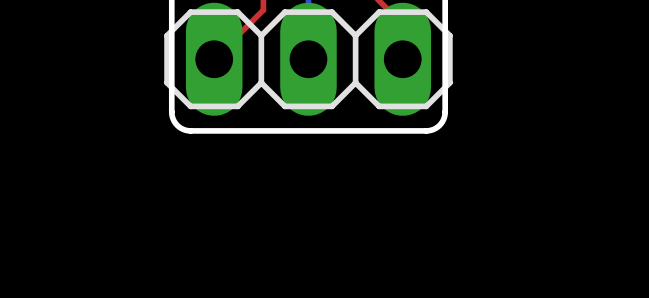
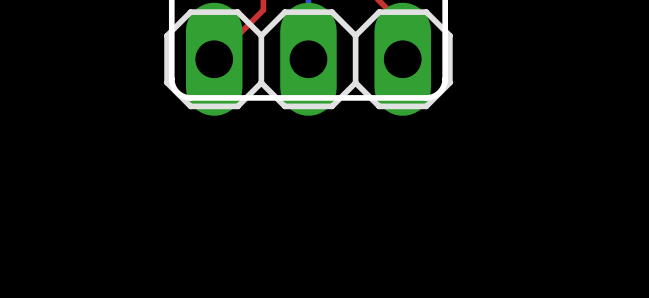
board edge: (171, 79) (173, 119) (179, 127) (190, 130) (431, 130) (439, 125) (444, 116) (445, 79) -> (171, 79) (177, 92) (190, 97) (428, 97) (441, 90) (445, 79)

